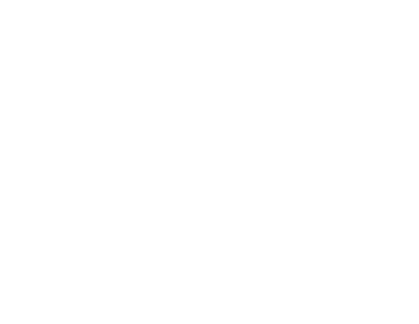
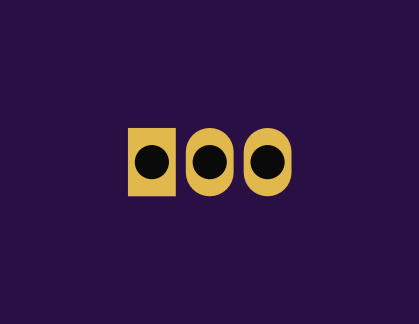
part: none -> (209, 162)

